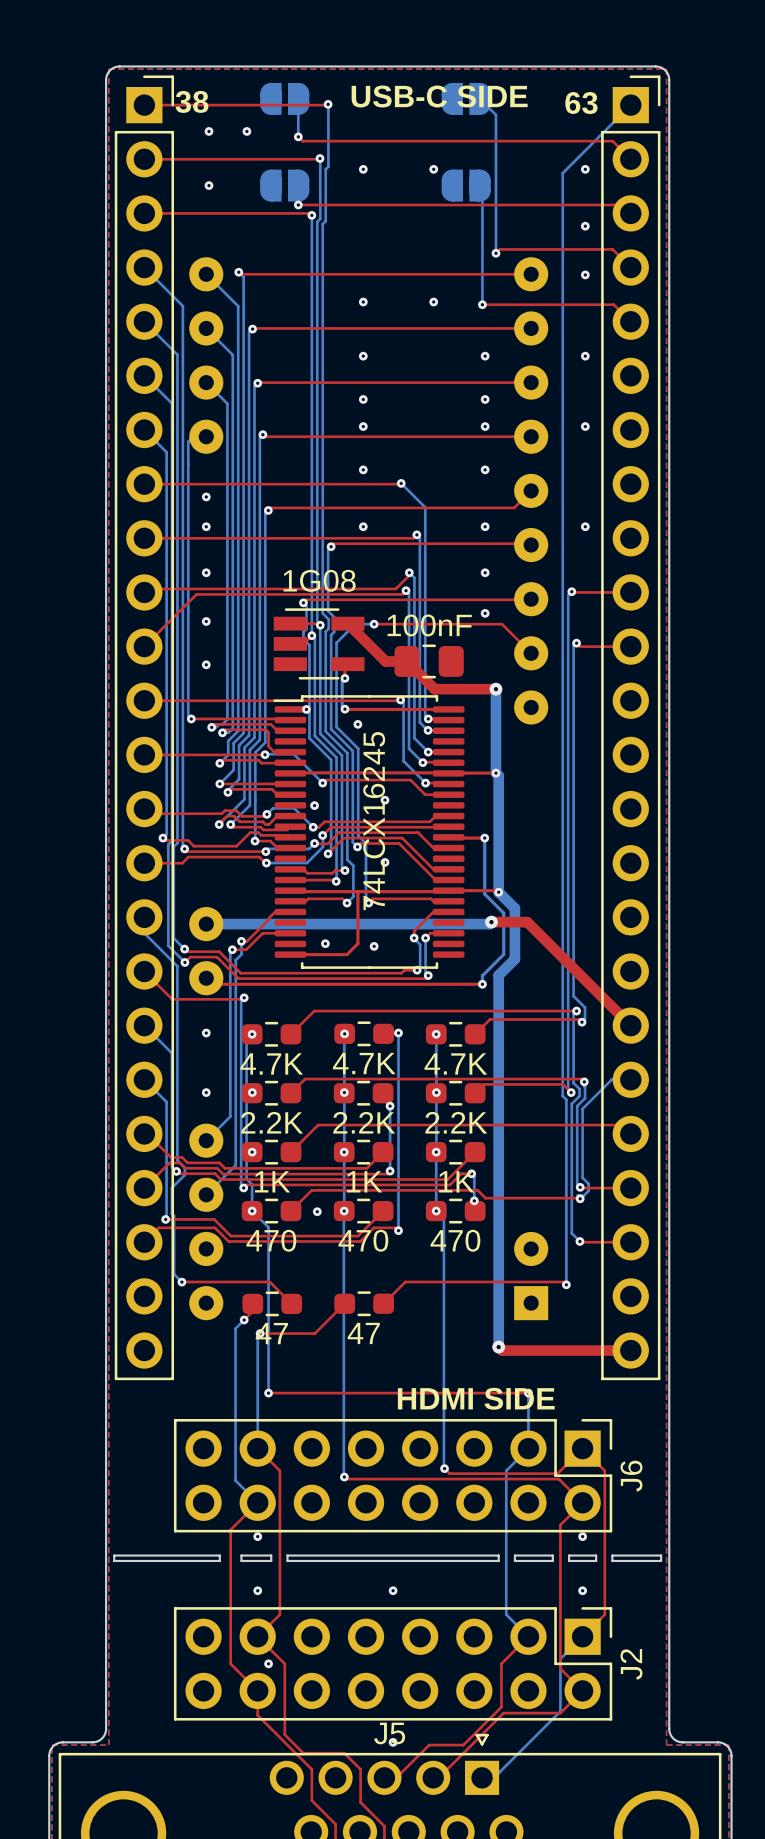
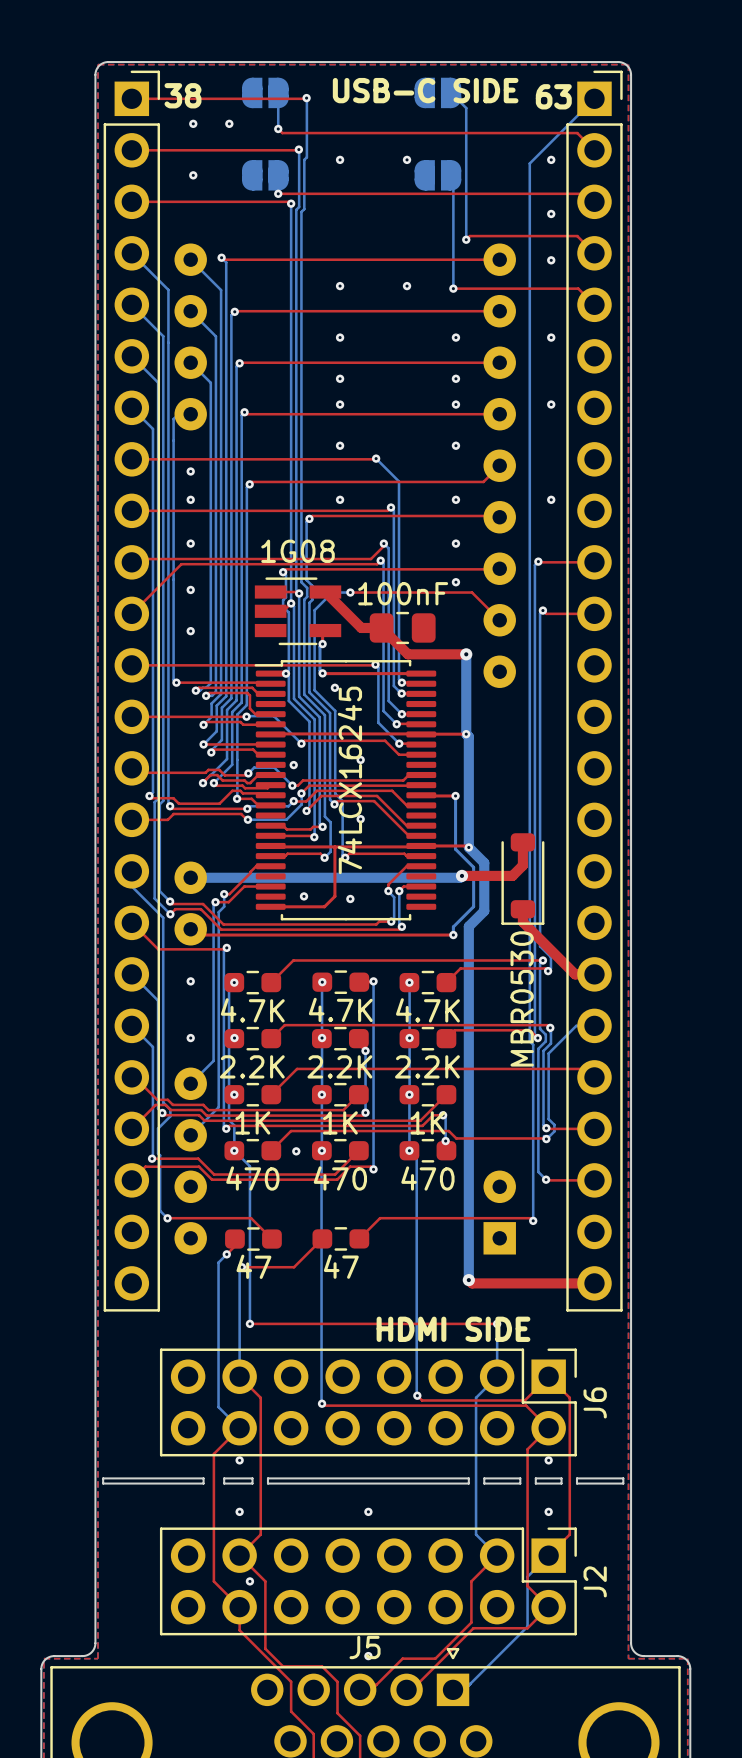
top track: none -> (522, 842) (522, 865) (512, 875) (496, 875)
top track: (527, 922) (630, 1025) -> (522, 909) (522, 922) (575, 974) (594, 974)
part: none -> MBR0530 (522, 879)

